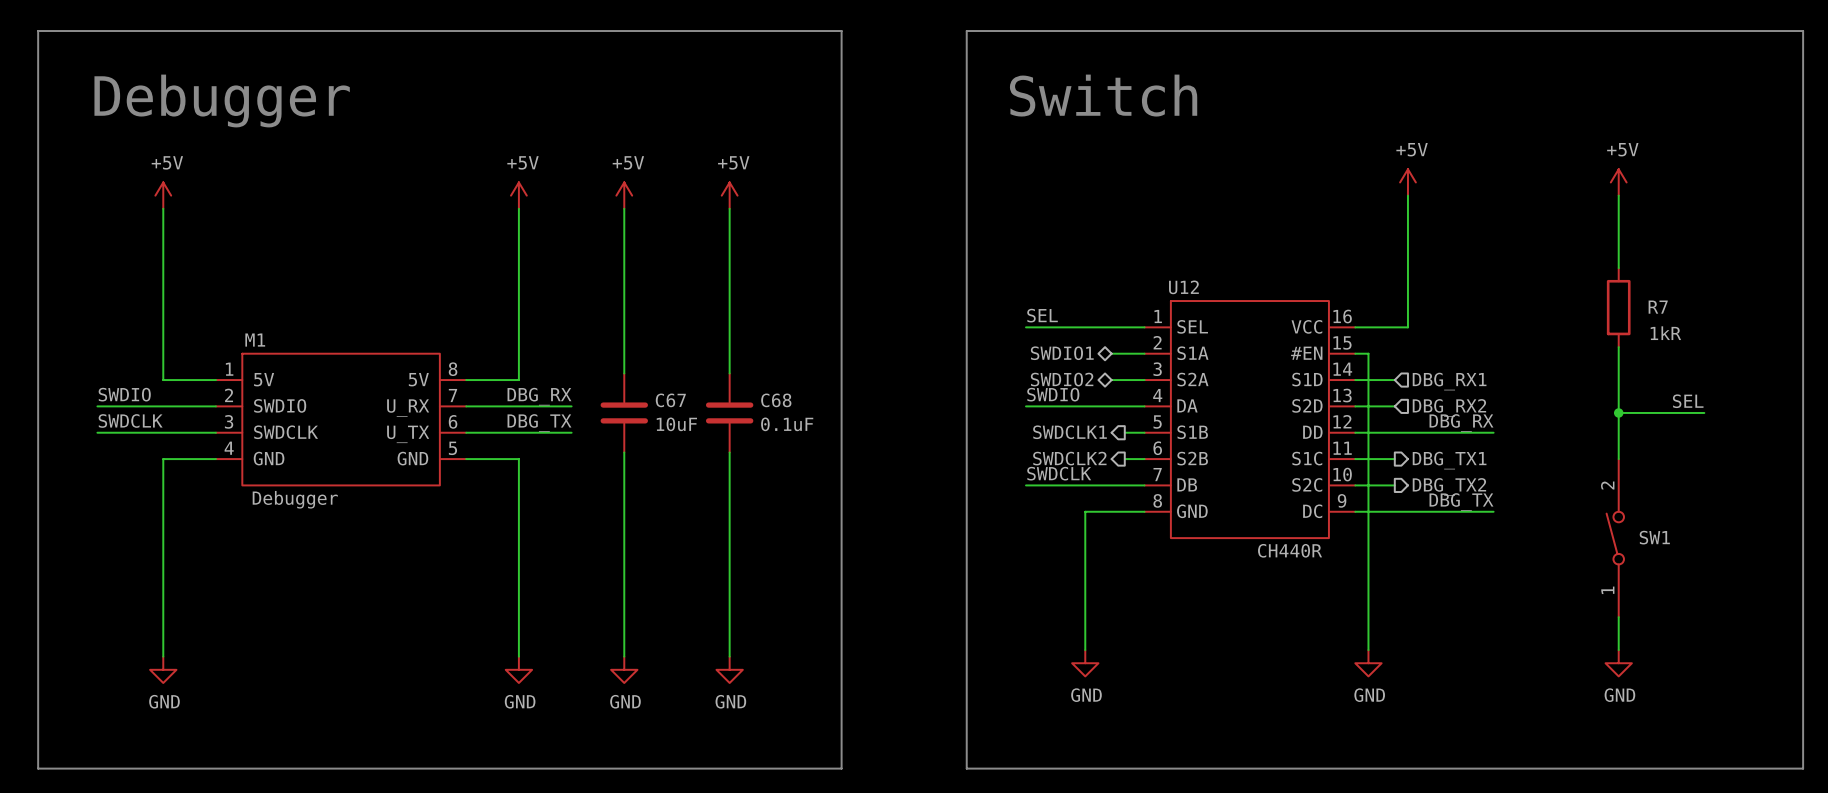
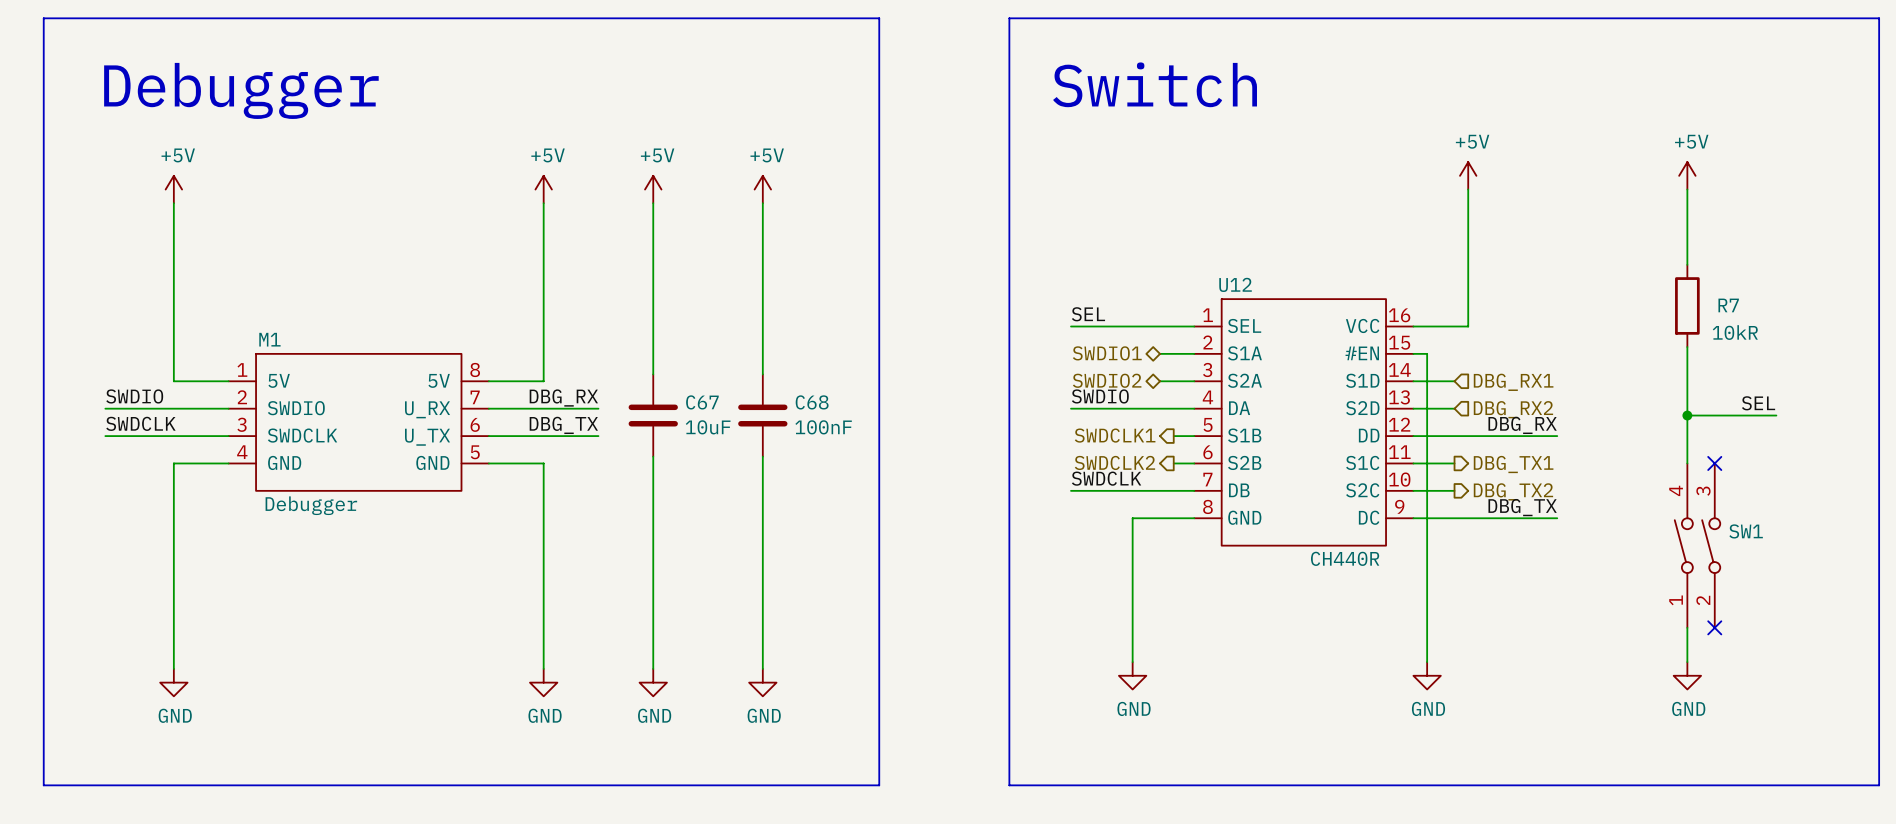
R7 value: 1kR (1665, 333) -> 10kR (1735, 332)
C68 value: 0.1uF (787, 424) -> 100nF (823, 427)
SW1 symbol: [1606, 459, 1624, 618] -> [1674, 463, 1721, 628]
no-connect mark: none -> (1714, 463)
no-connect mark: none -> (1714, 627)

